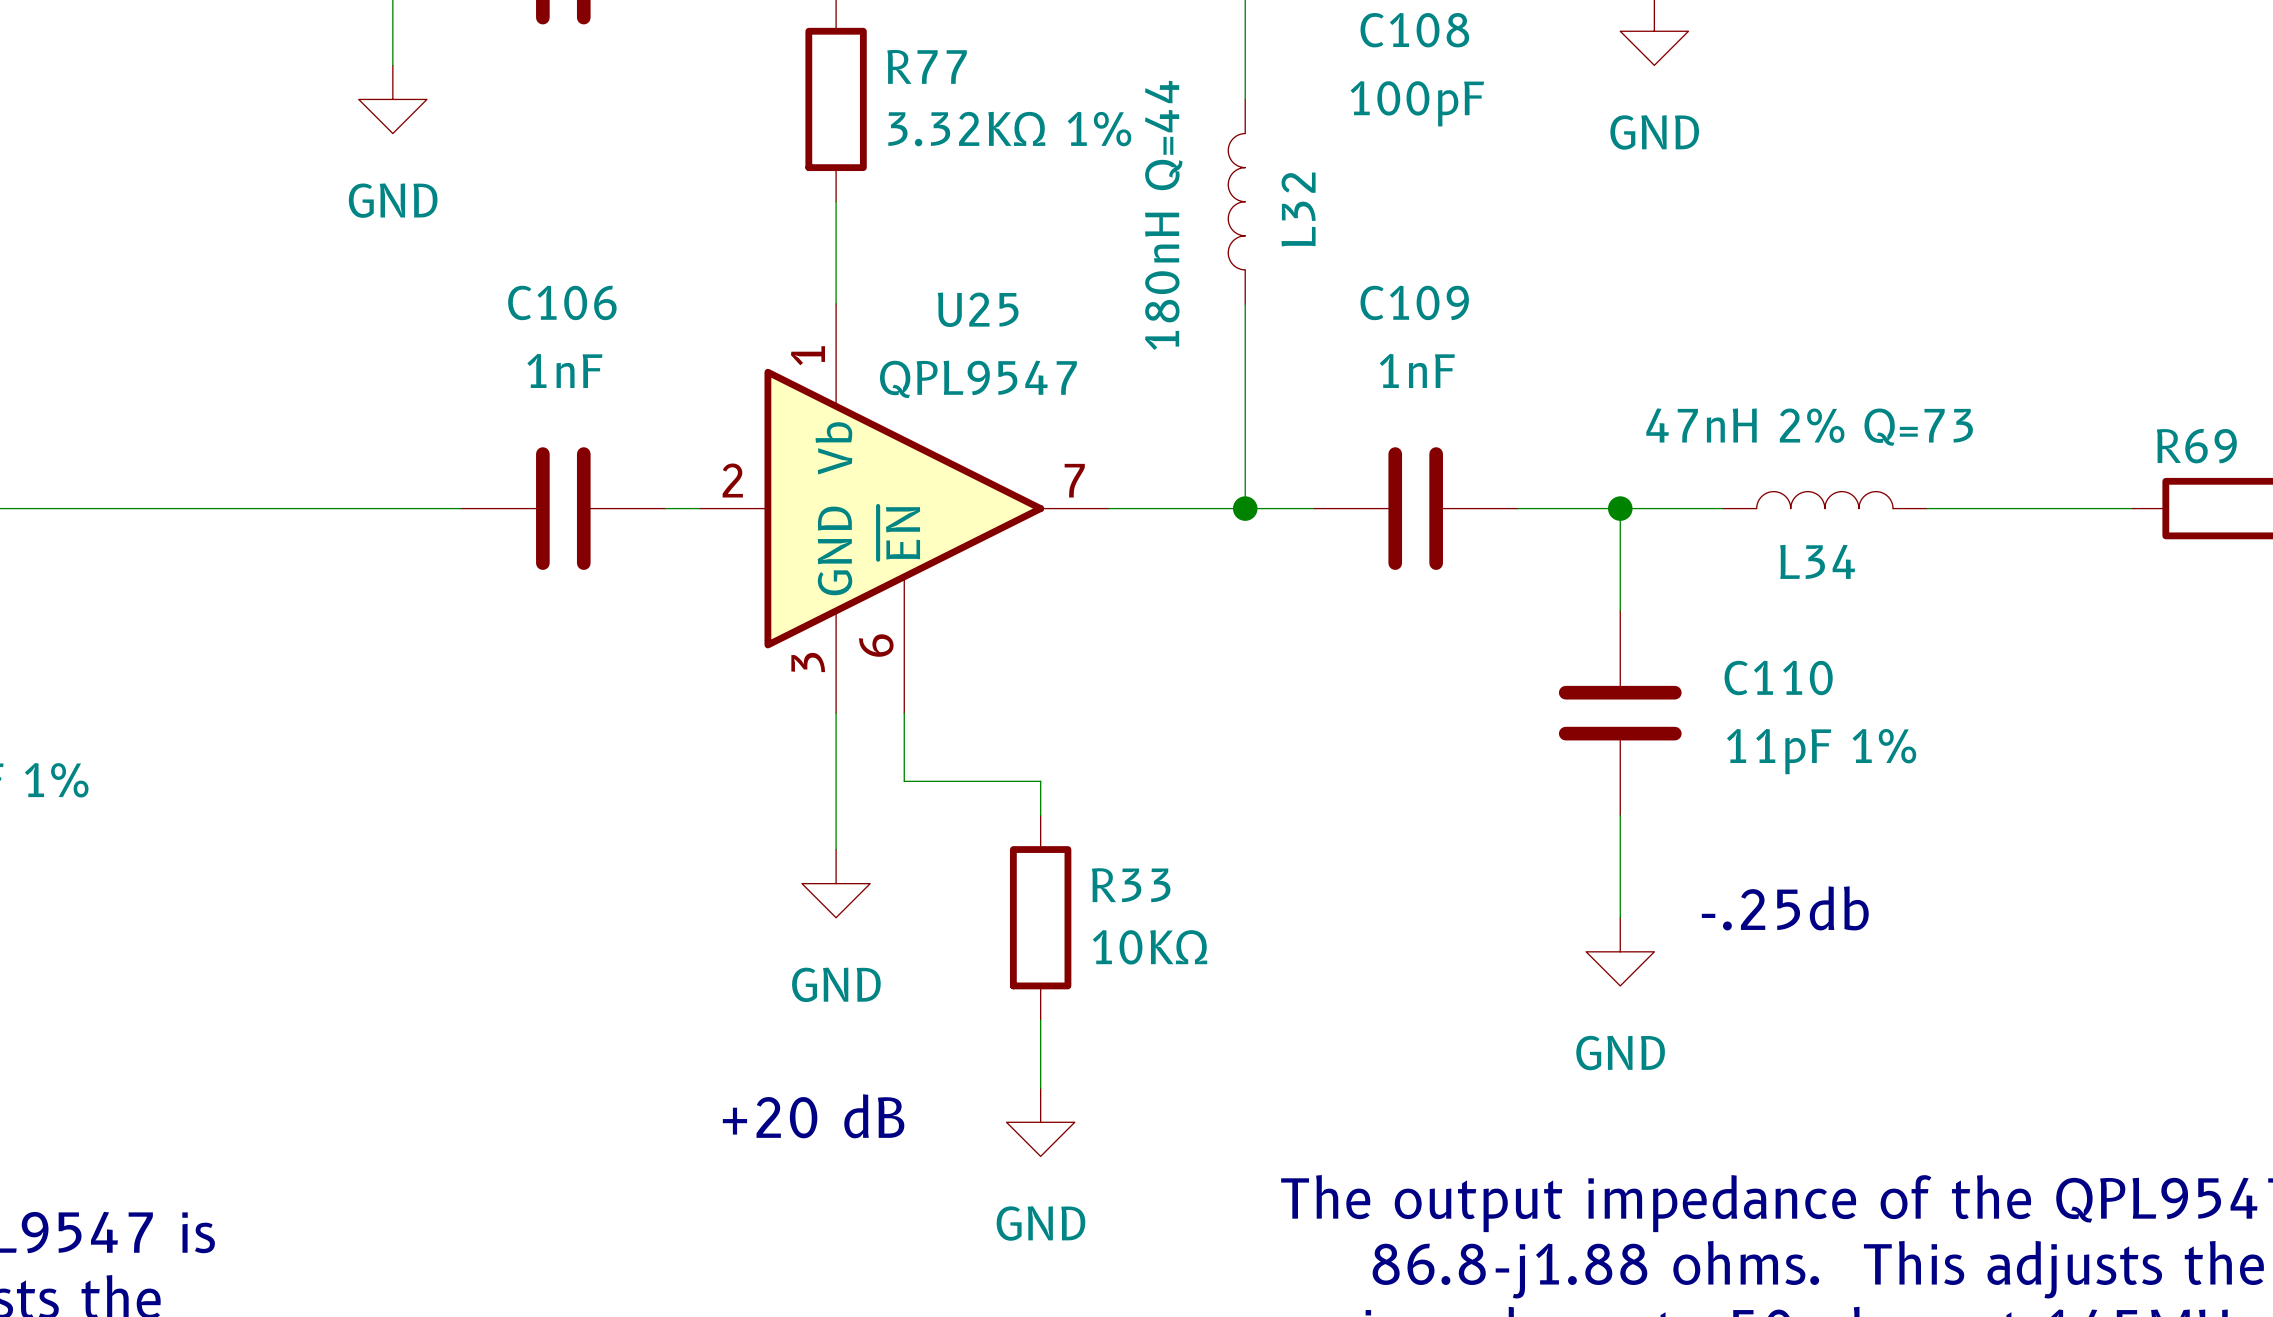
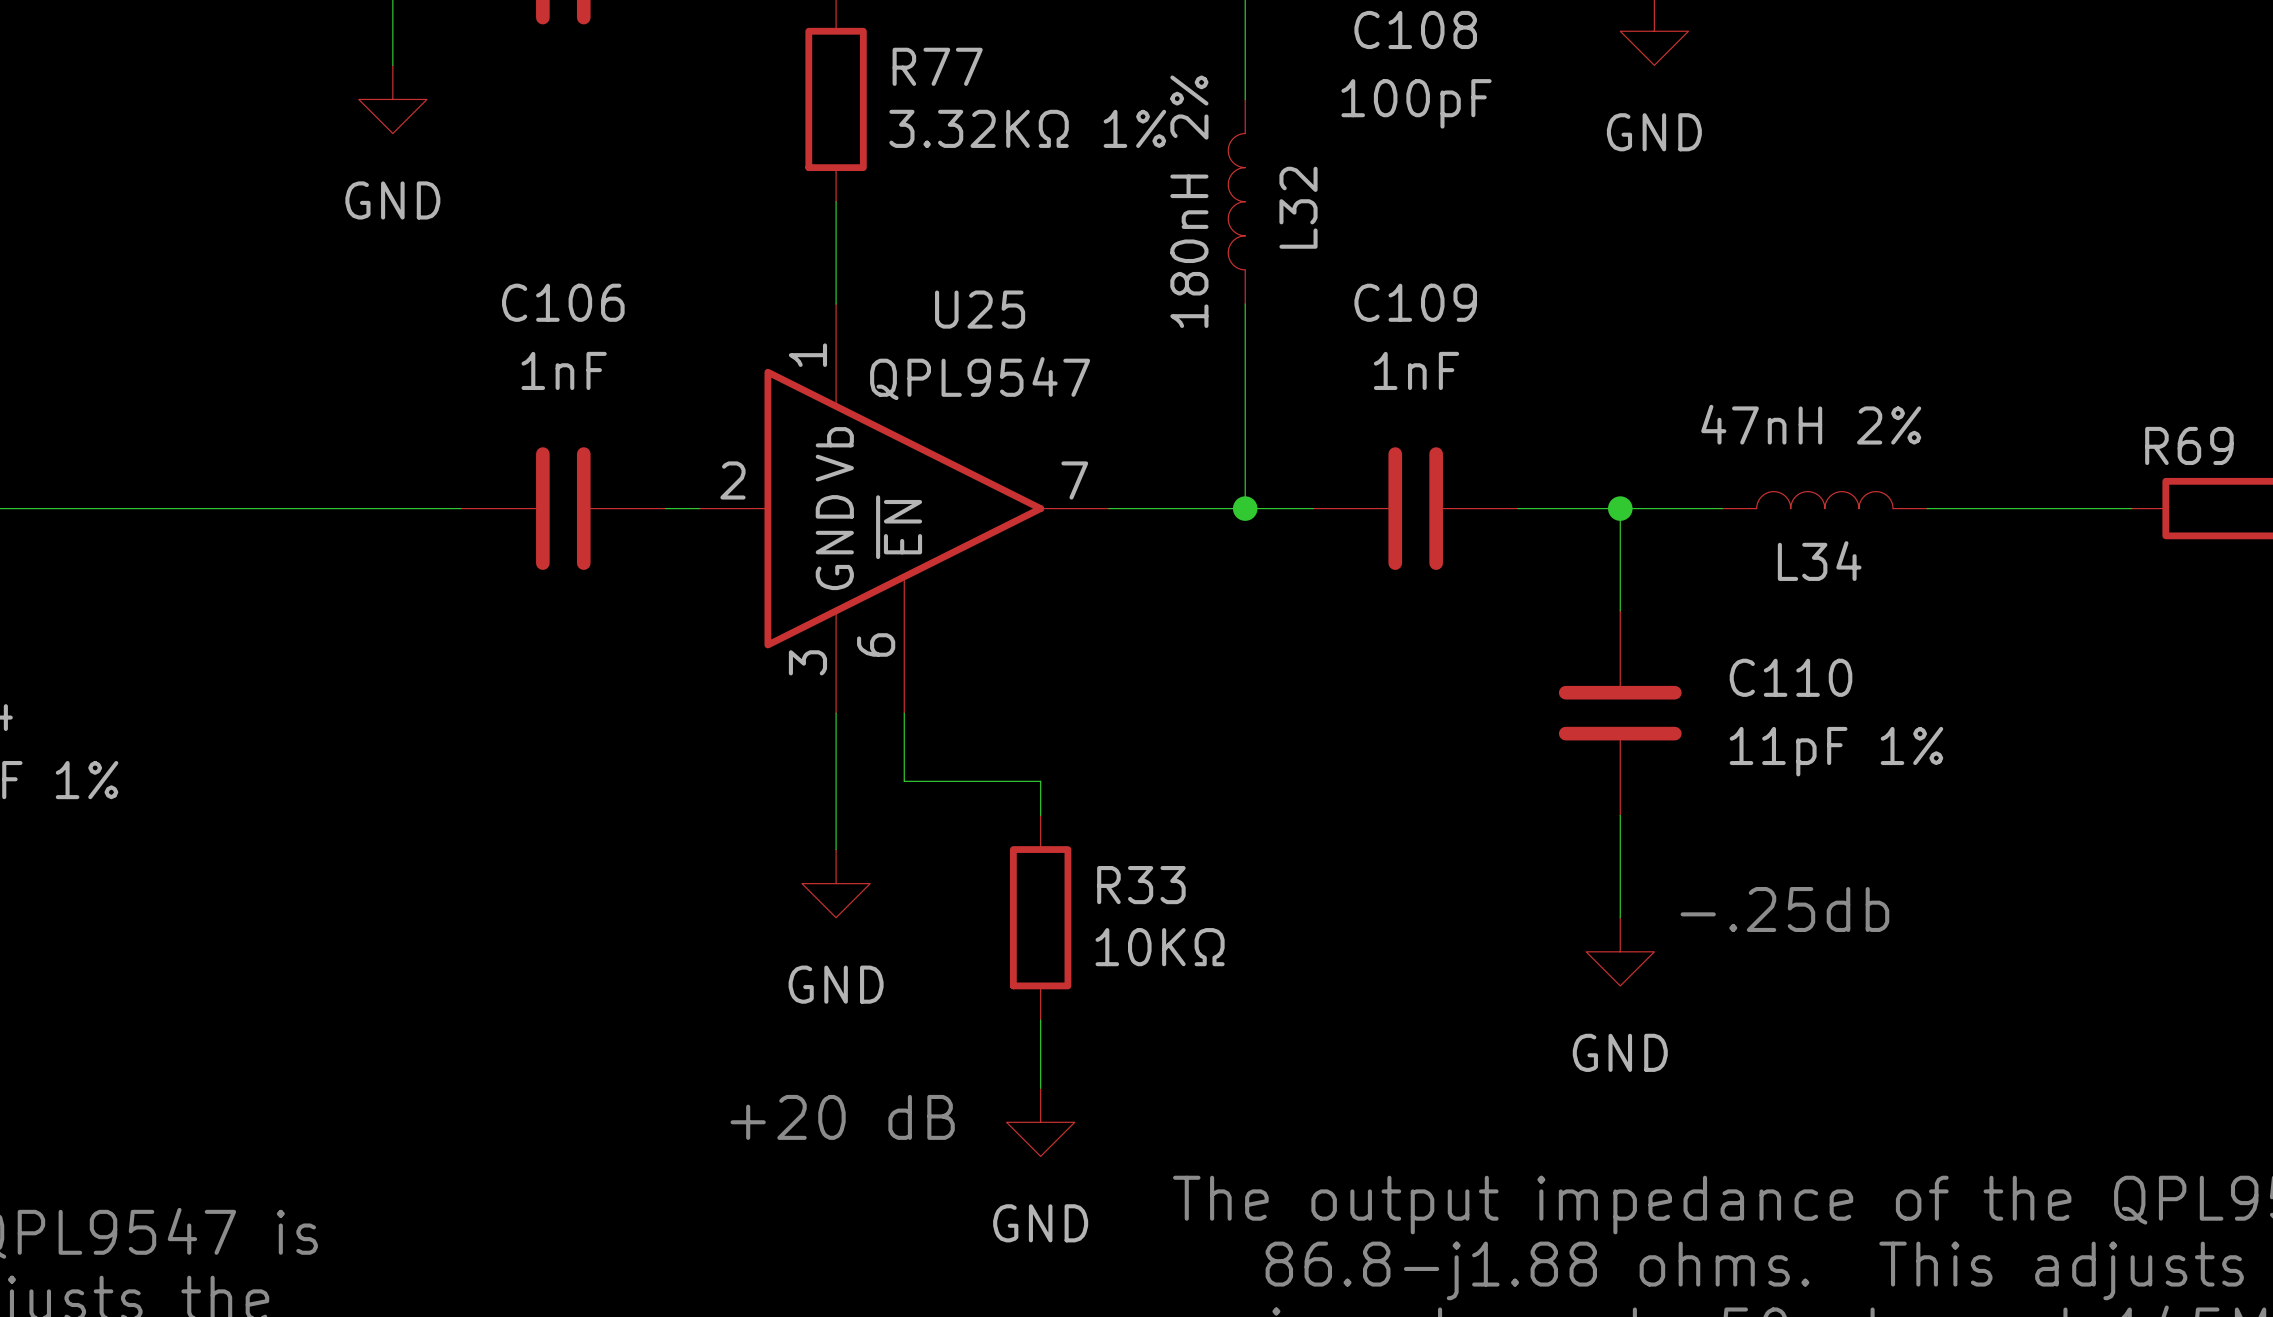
L32 value: 180nH Q=44 (1163, 215) -> 180nH 2% (1189, 201)
L34 value: 47nH 2% Q=73 (1809, 427) -> 47nH 2% (1811, 424)

